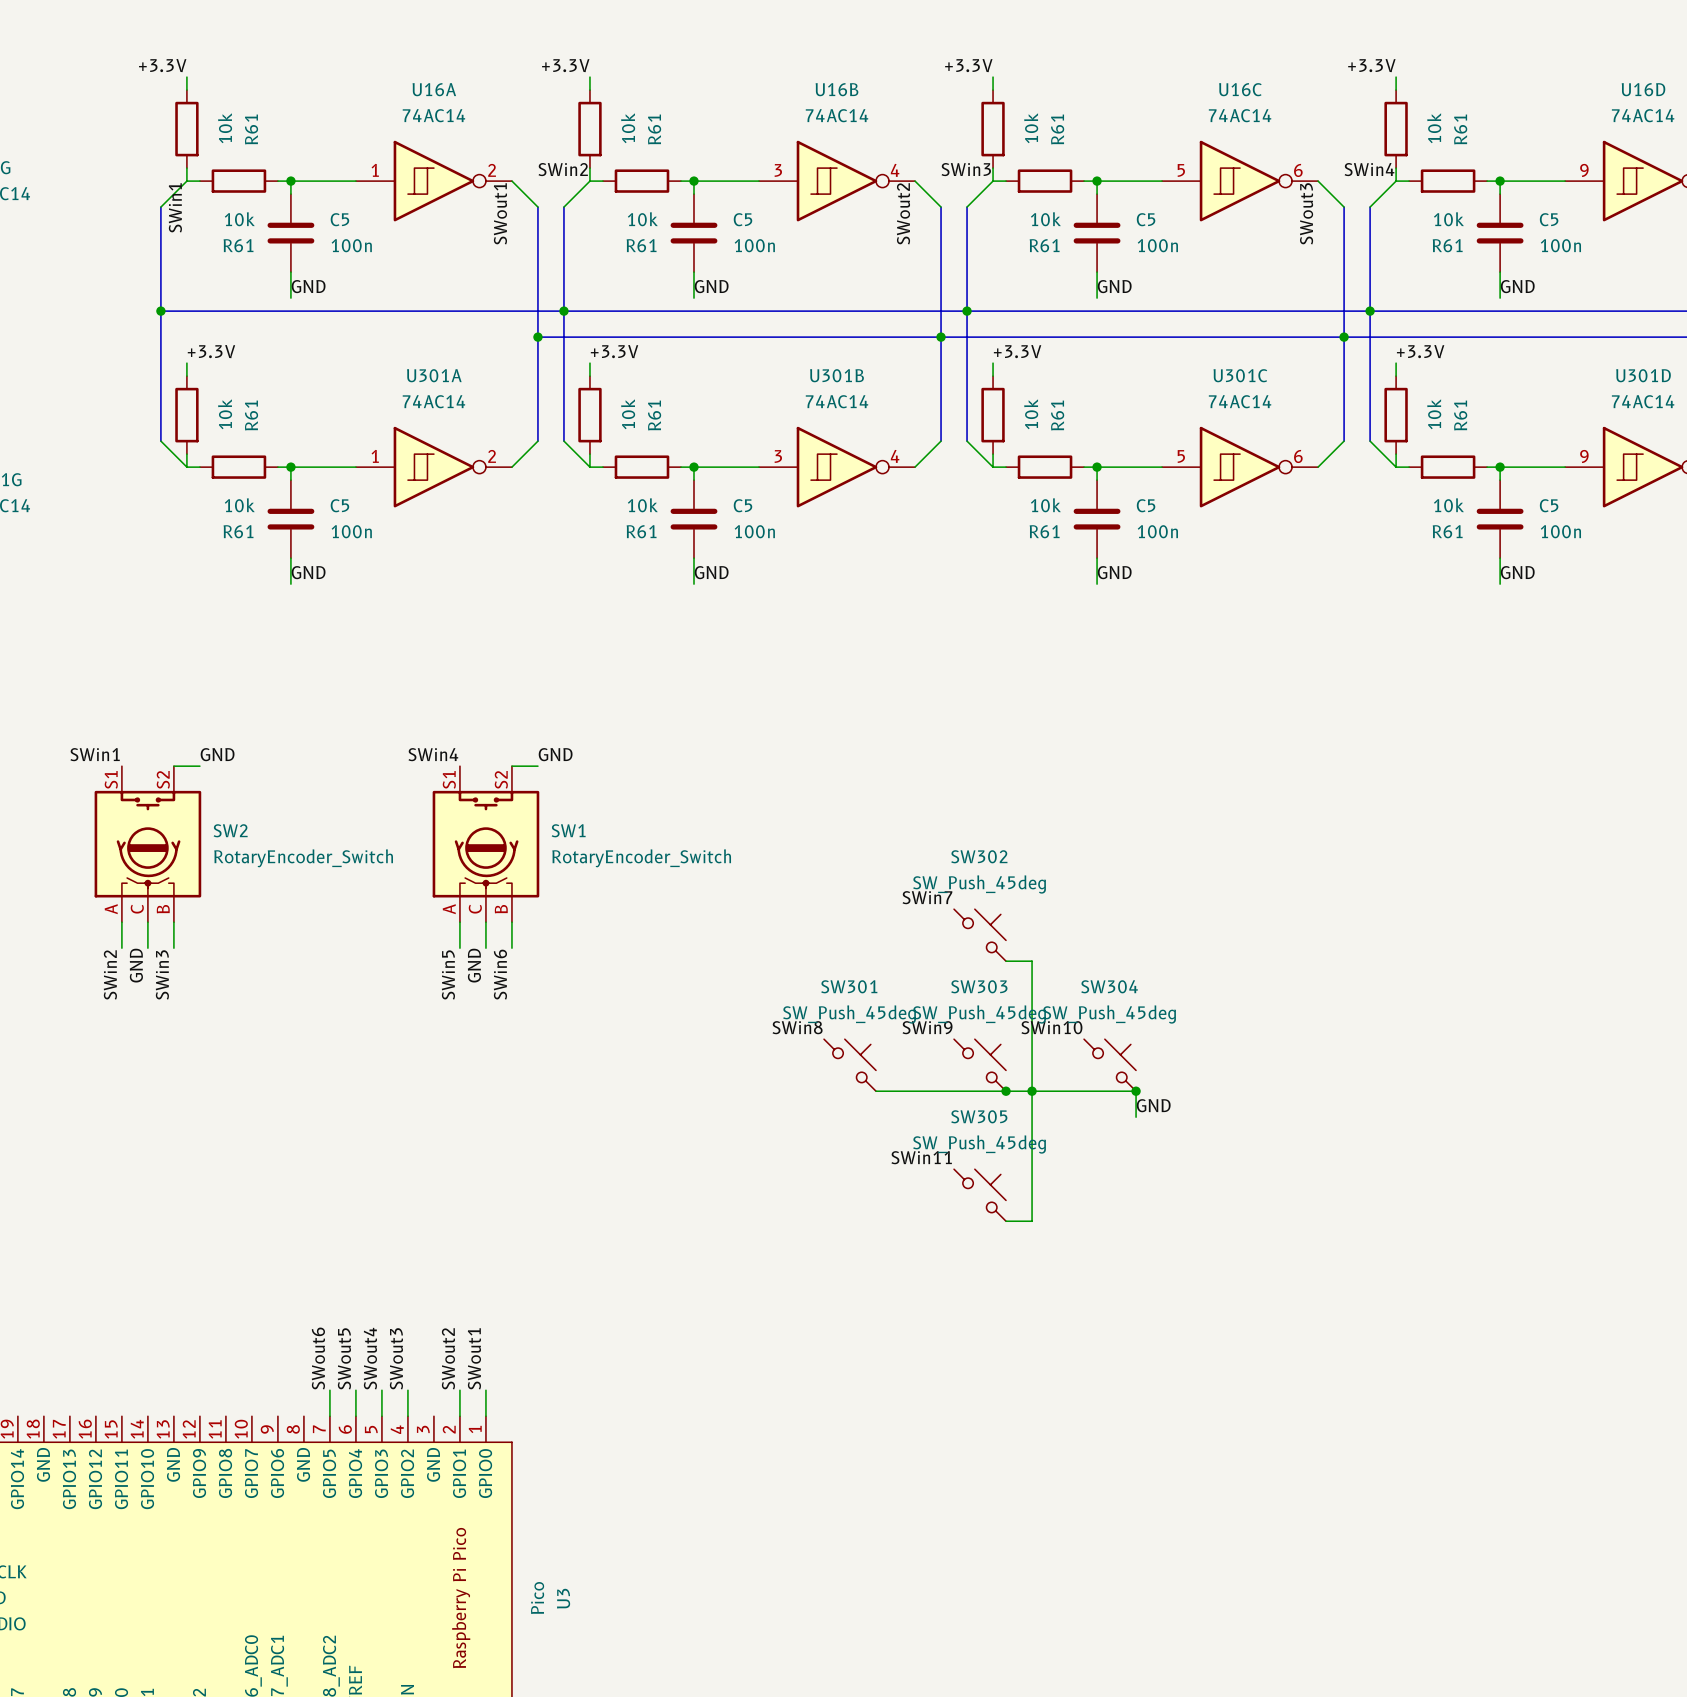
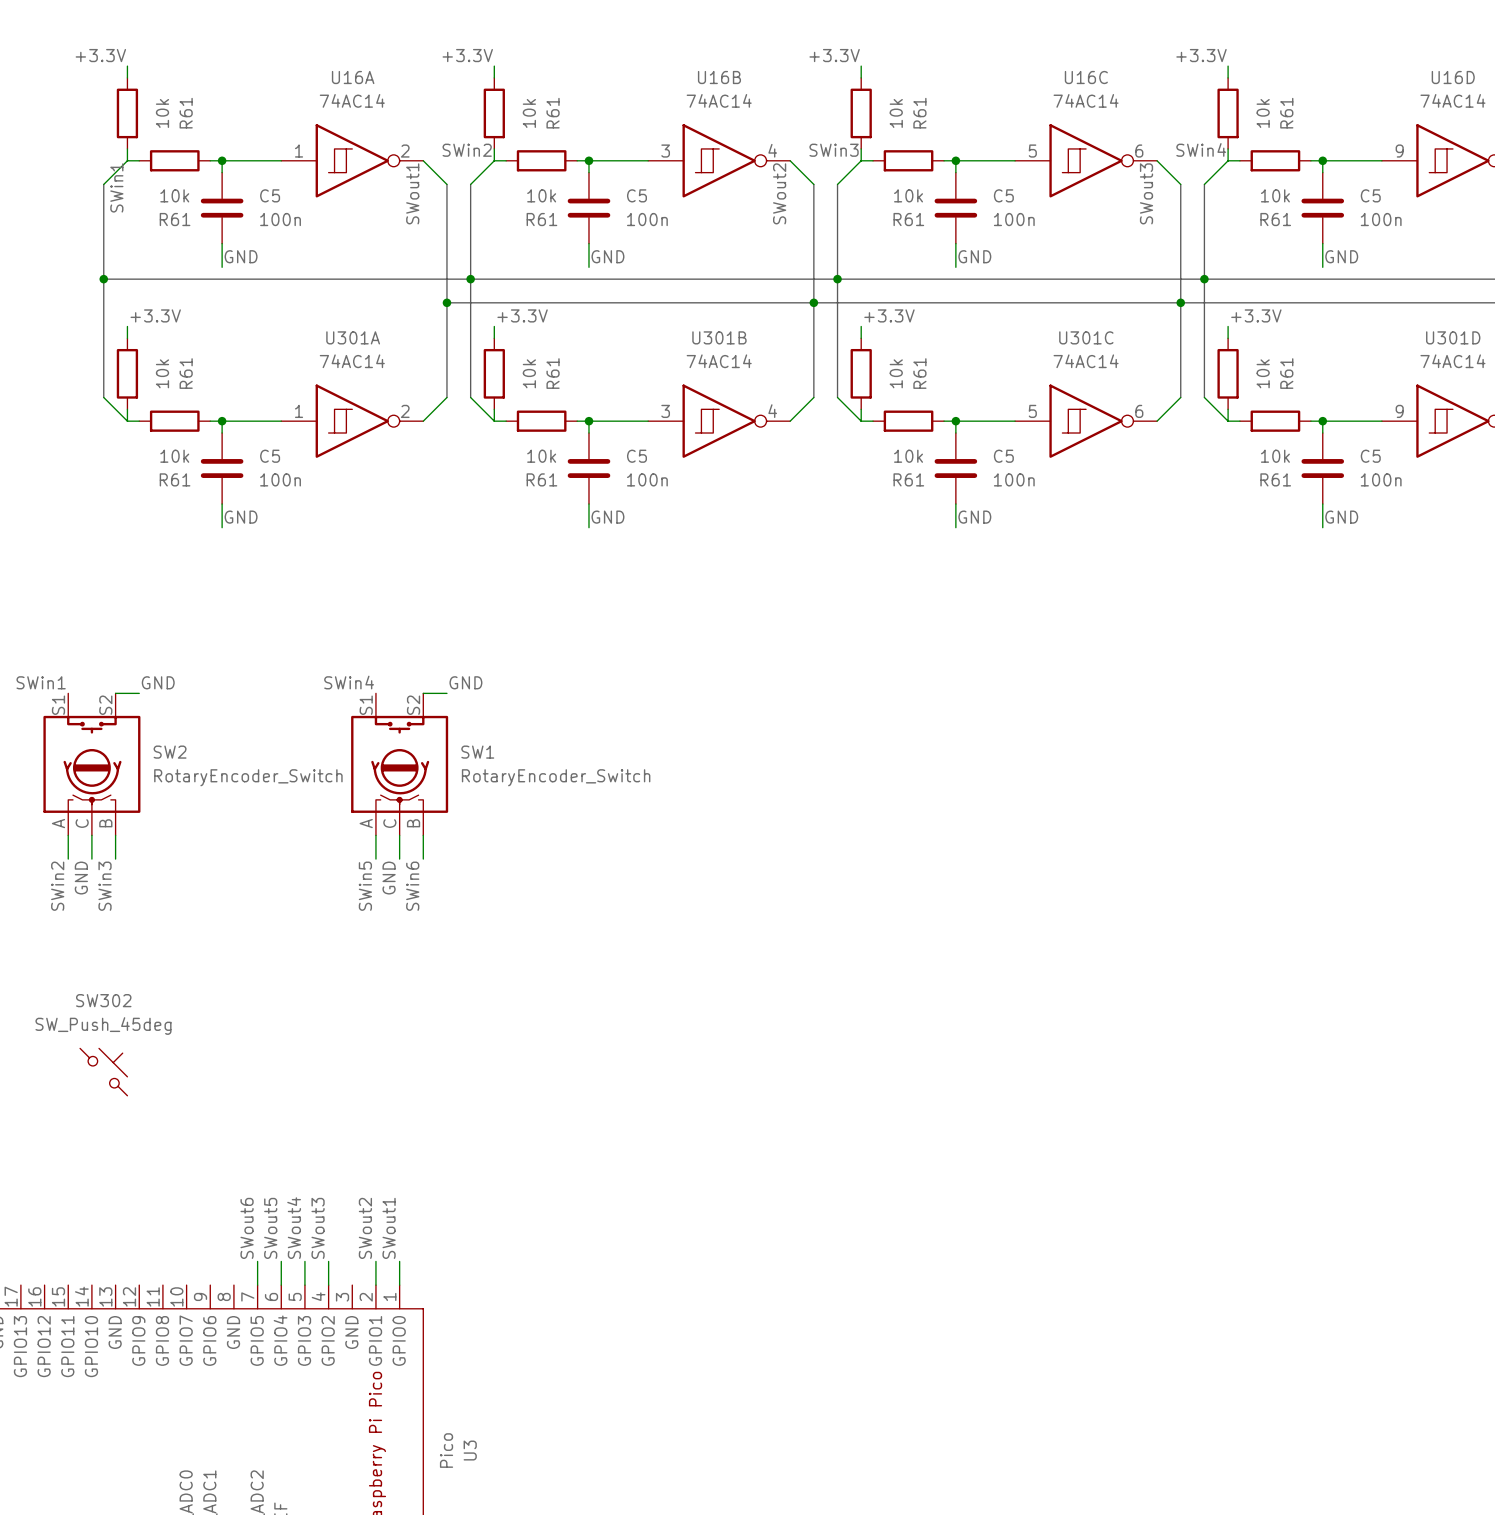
label: SWin7 (927, 897) -> none
SW302 position: (980, 935) -> (103, 1072)
wire: (1006, 961) (1032, 961) (1032, 1221) (1006, 1221) -> none
label: SWin8 (797, 1027) -> none
label: SWin9 (927, 1027) -> none
label: SWin10 (1051, 1027) -> none
SW301: SW_Push_45deg (850, 1065) -> none
SW303: SW_Push_45deg (980, 1065) -> none
SW304: SW_Push_45deg (1110, 1065) -> none
wire: (876, 1091) (1136, 1091) (1136, 1117) -> none
junction: (1006, 1091) -> none
junction: (1032, 1091) -> none
junction: (1136, 1091) -> none
label: GND (1153, 1105) -> none
label: SWin11 (921, 1157) -> none
SW305: SW_Push_45deg (980, 1195) -> none

